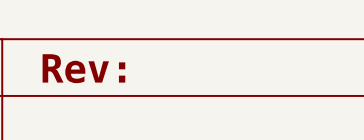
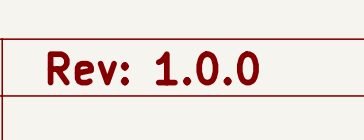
title block: Rev: (83, 68) -> Rev: 1.0.0 (153, 68)

